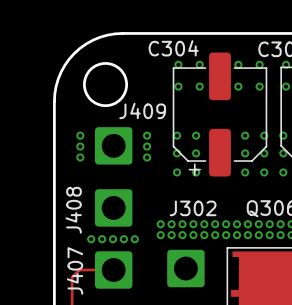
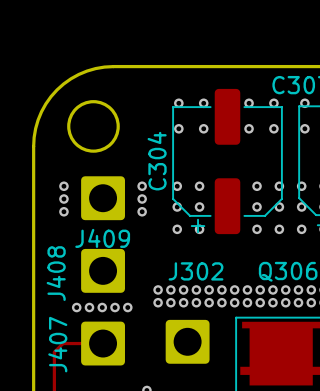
C304 name rotation: 0° (173, 48) -> 90° counterclockwise (157, 161)
C304 name position: C304 (173, 48) -> C304 (157, 161)
J409 name position: J409 (142, 110) -> J409 (102, 238)

